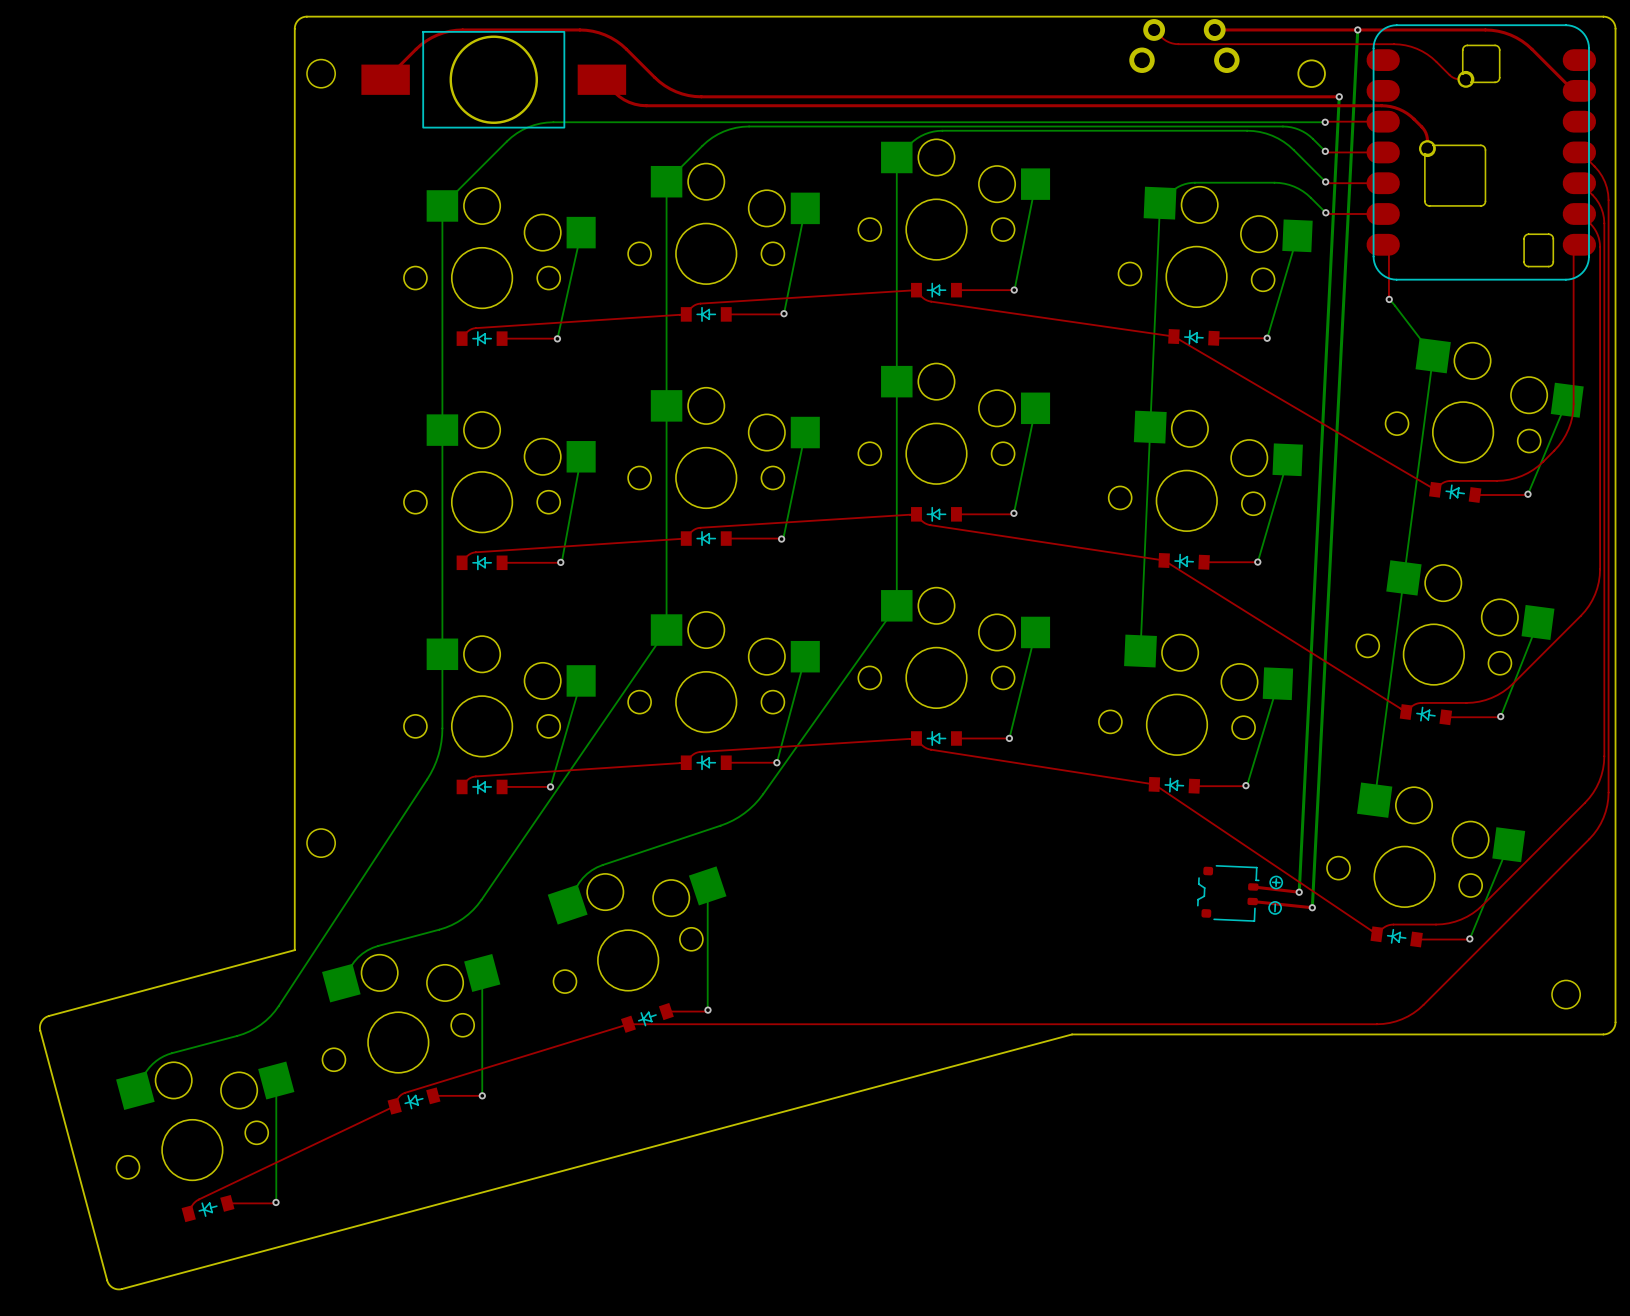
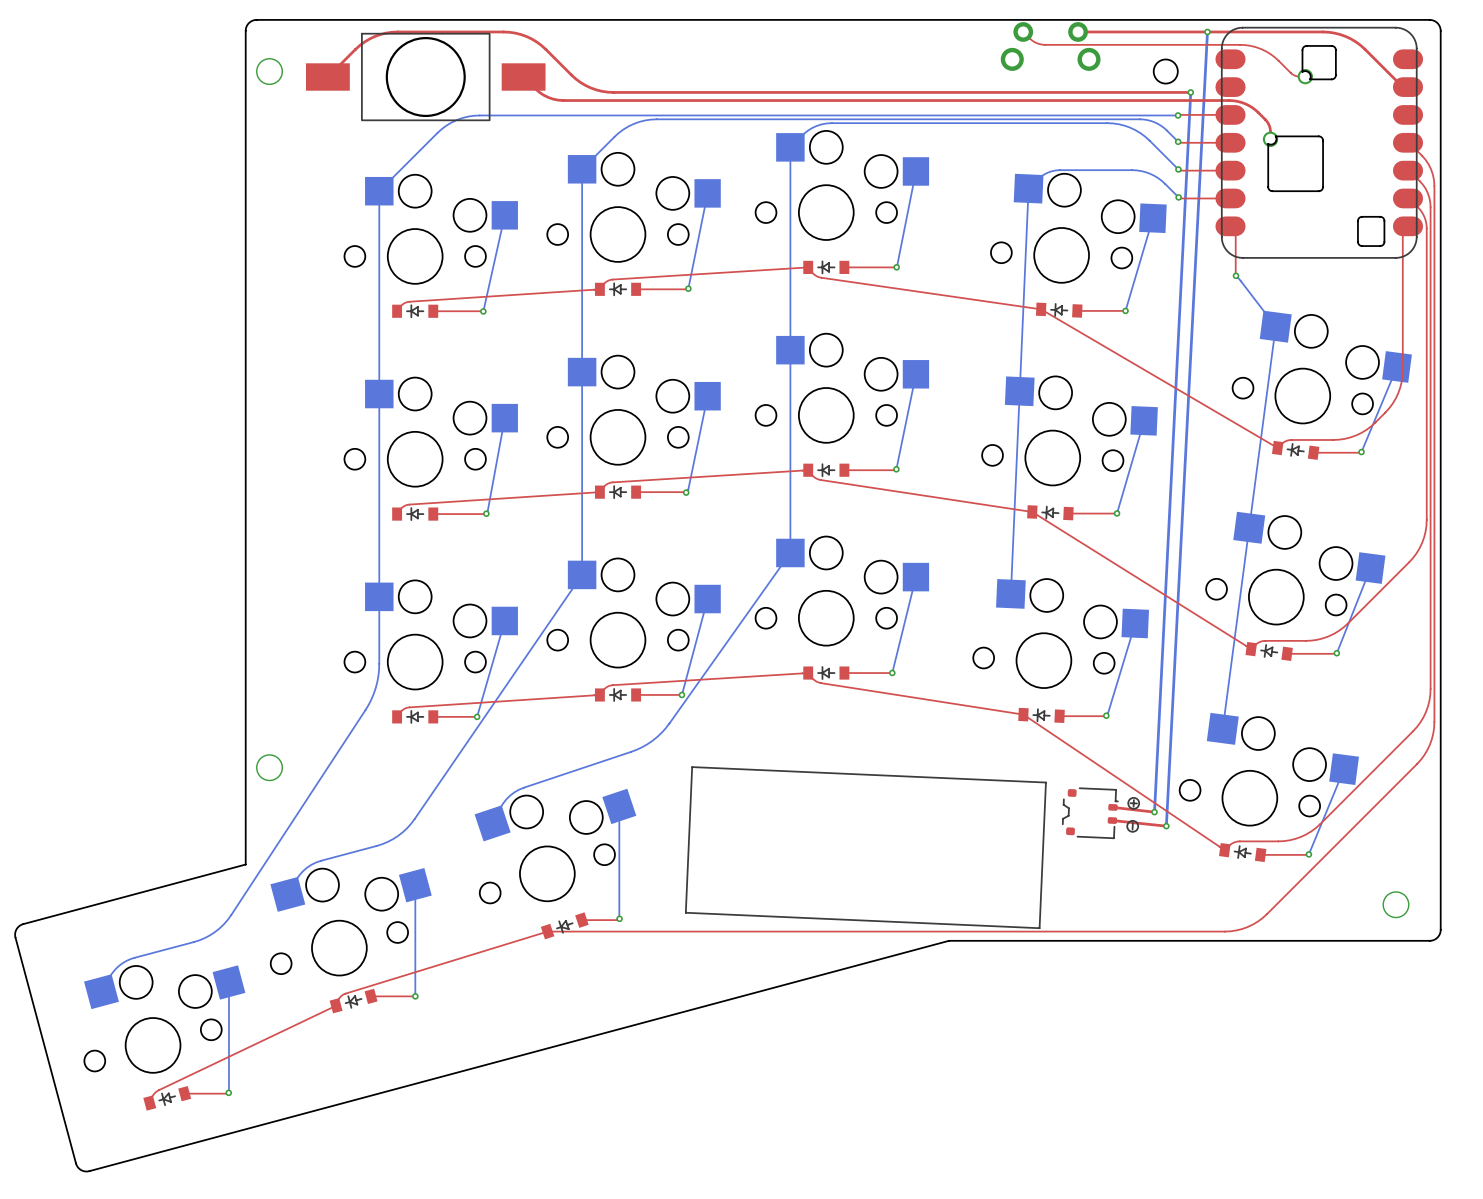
line: none -> (692, 767) (685, 912) (1039, 928) (1045, 782) (692, 767)

